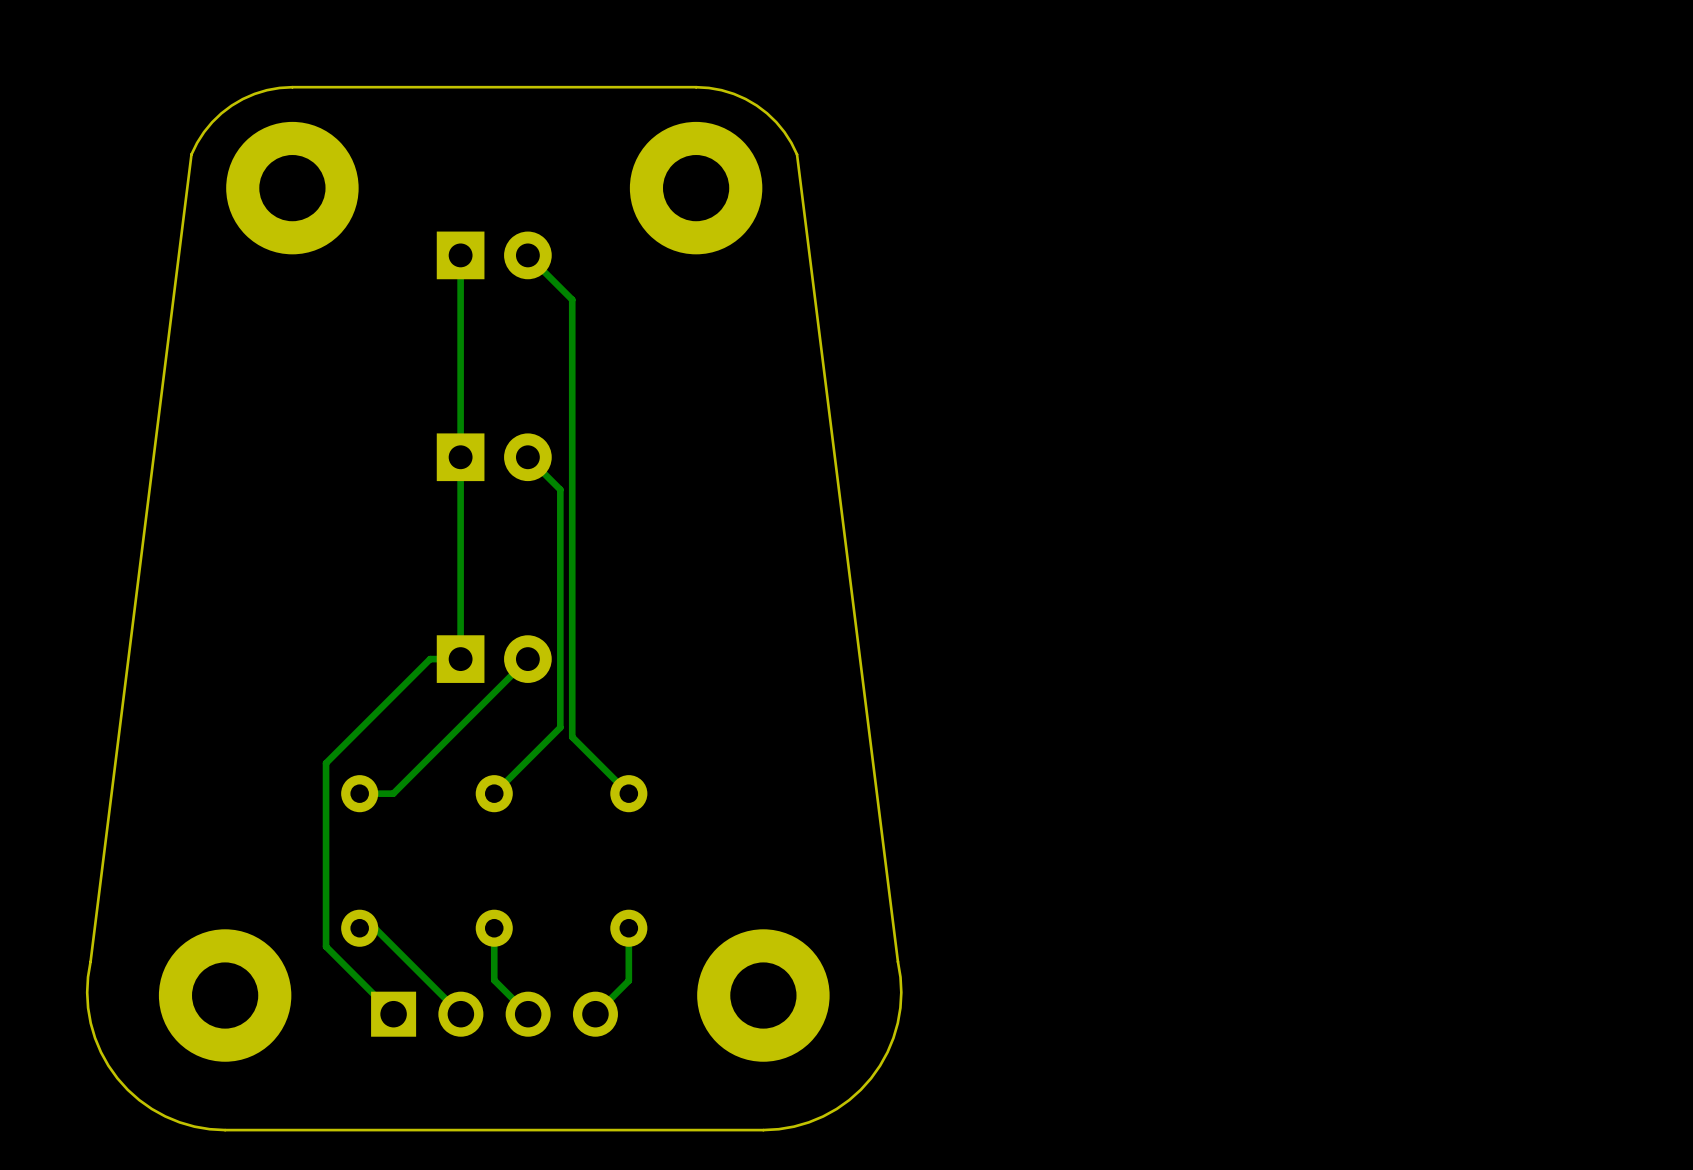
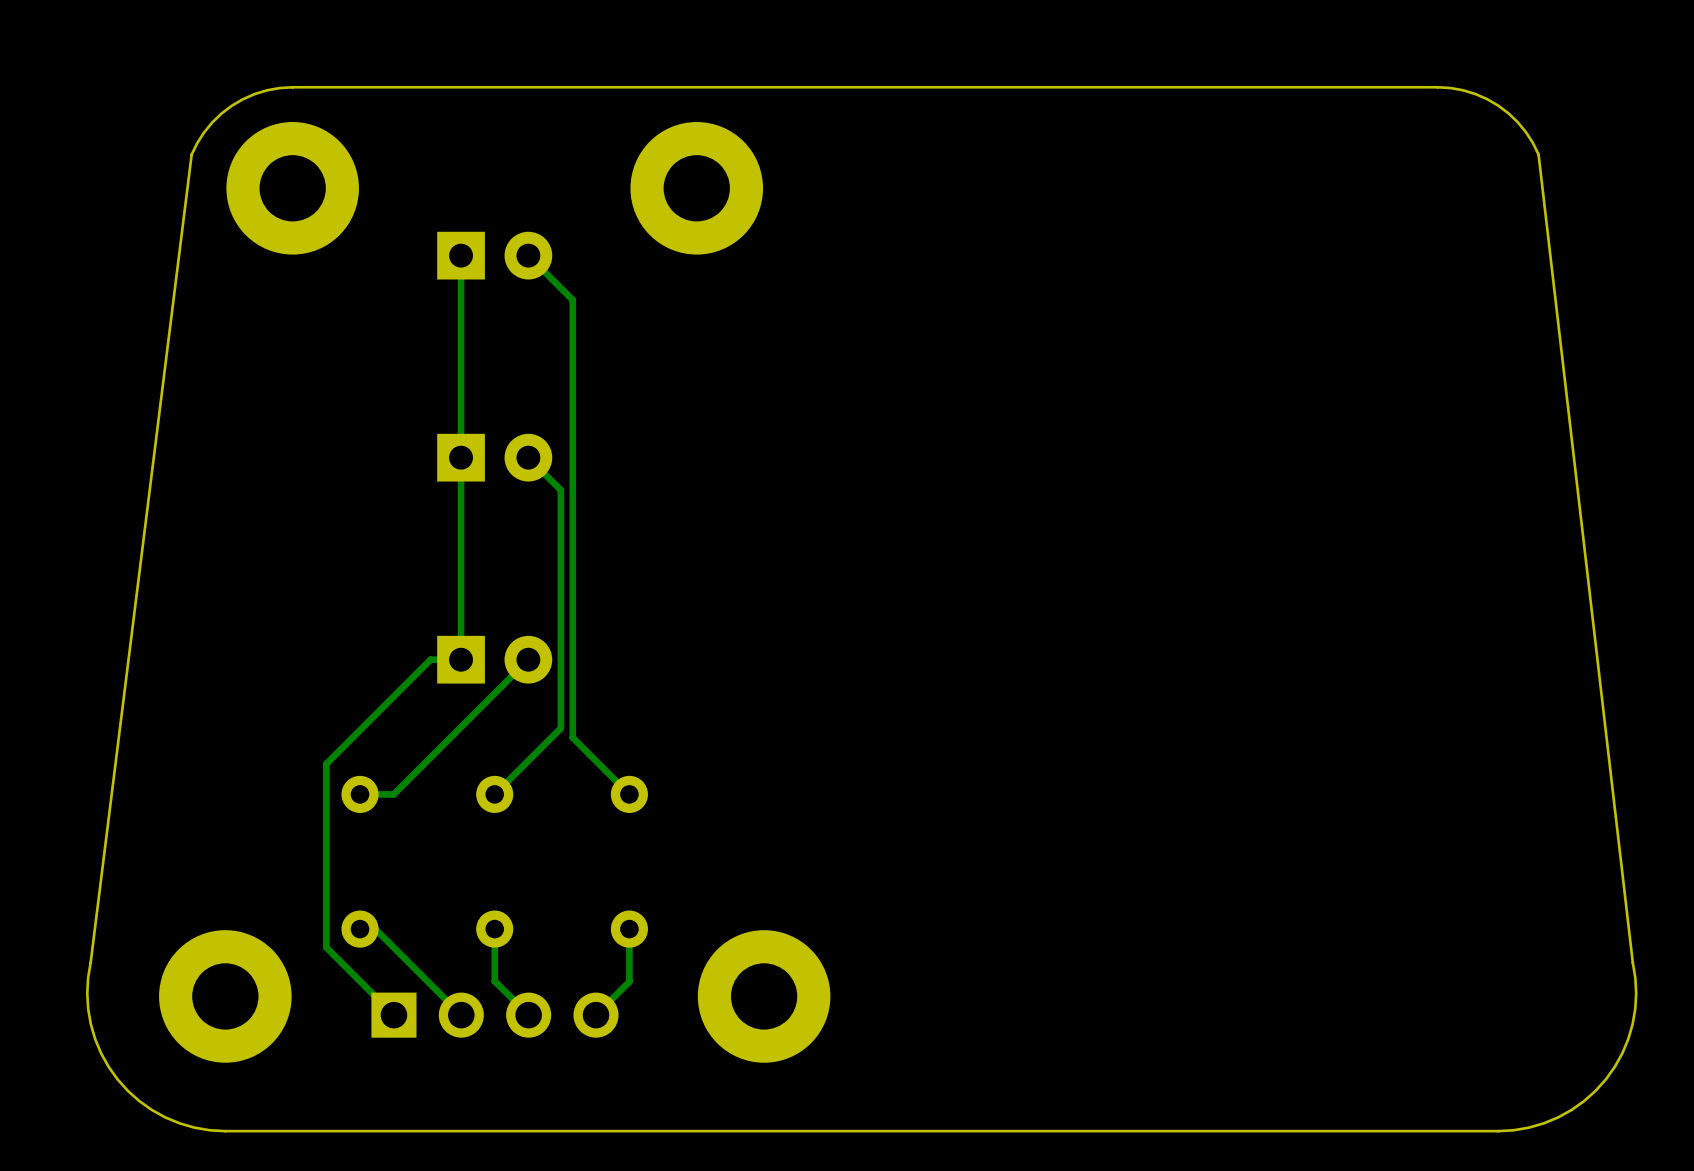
board edge: (696, 87) (721, 90) (745, 99) (756, 105) (767, 113) (784, 132) (797, 154) (900, 977) (900, 1007) (893, 1037) (880, 1065) (860, 1089) (836, 1109) (808, 1122) (794, 1126) (763, 1130) -> (696, 87) (1437, 87) (1450, 88) (1475, 94) (1487, 99) (1508, 113) (1525, 132) (1538, 154) (1635, 978) (1635, 1008) (1628, 1038) (1614, 1066) (1605, 1079) (1584, 1101) (1571, 1110) (1543, 1123) (1528, 1127) (1498, 1131) (764, 1131)

